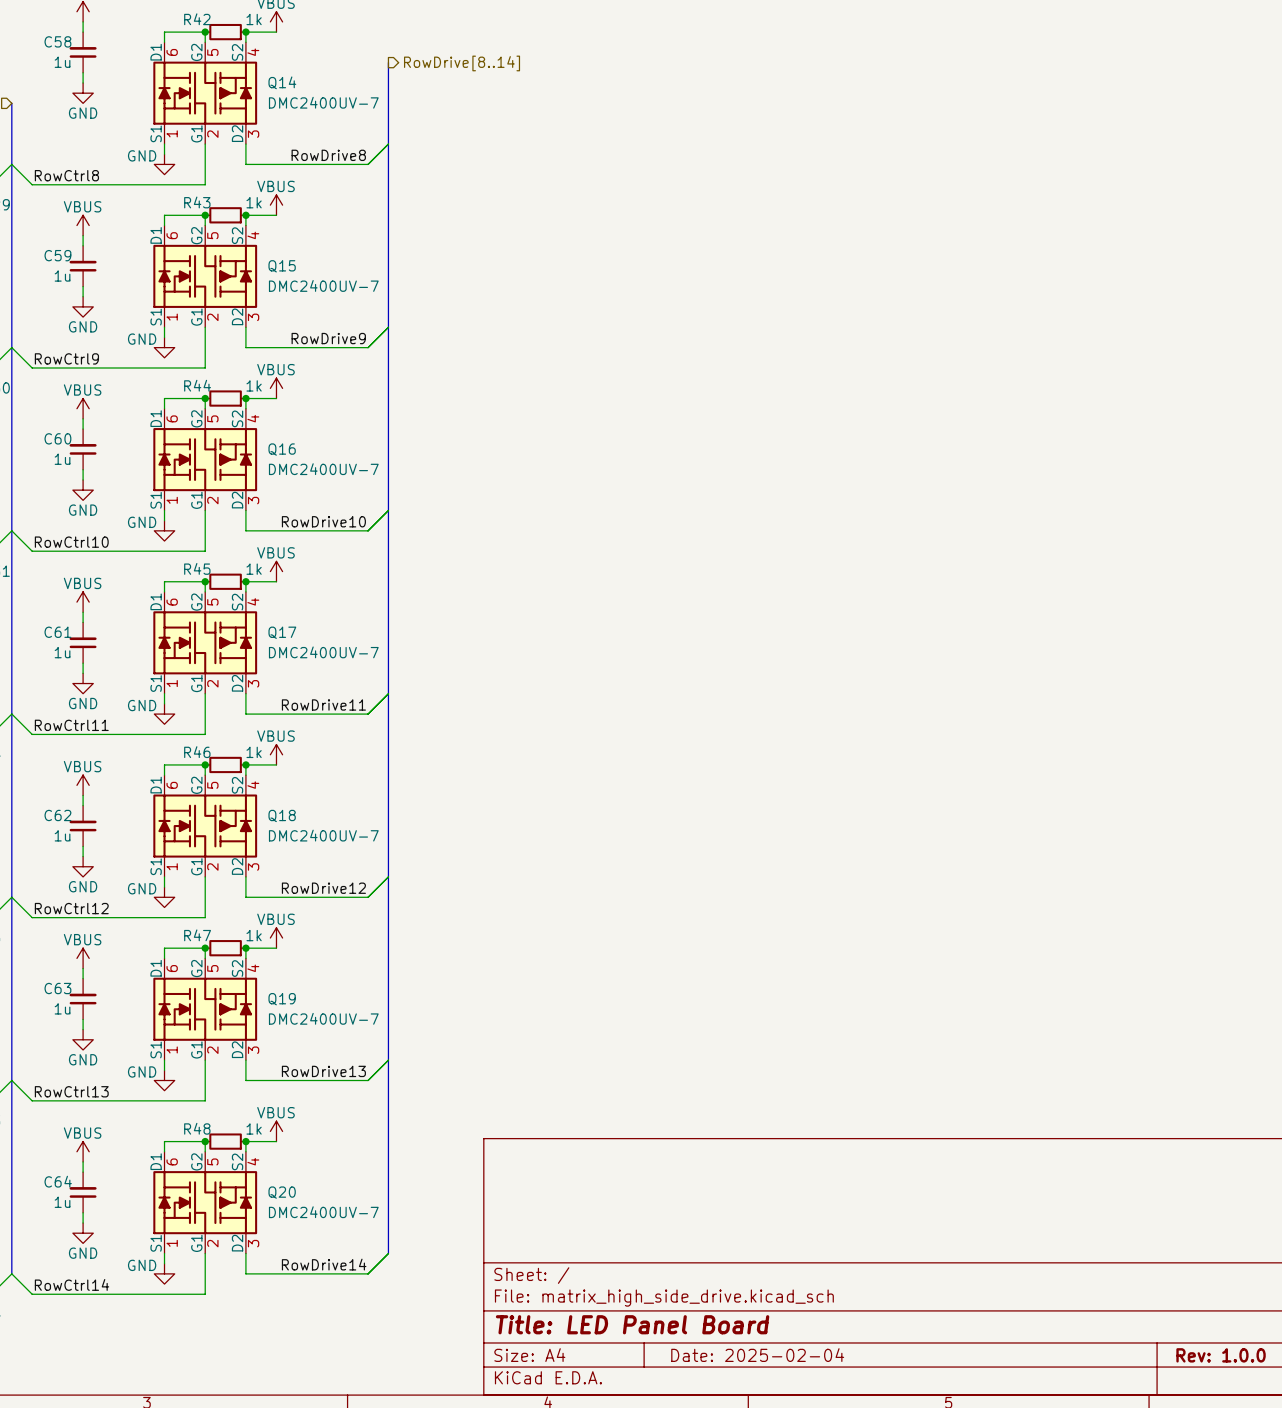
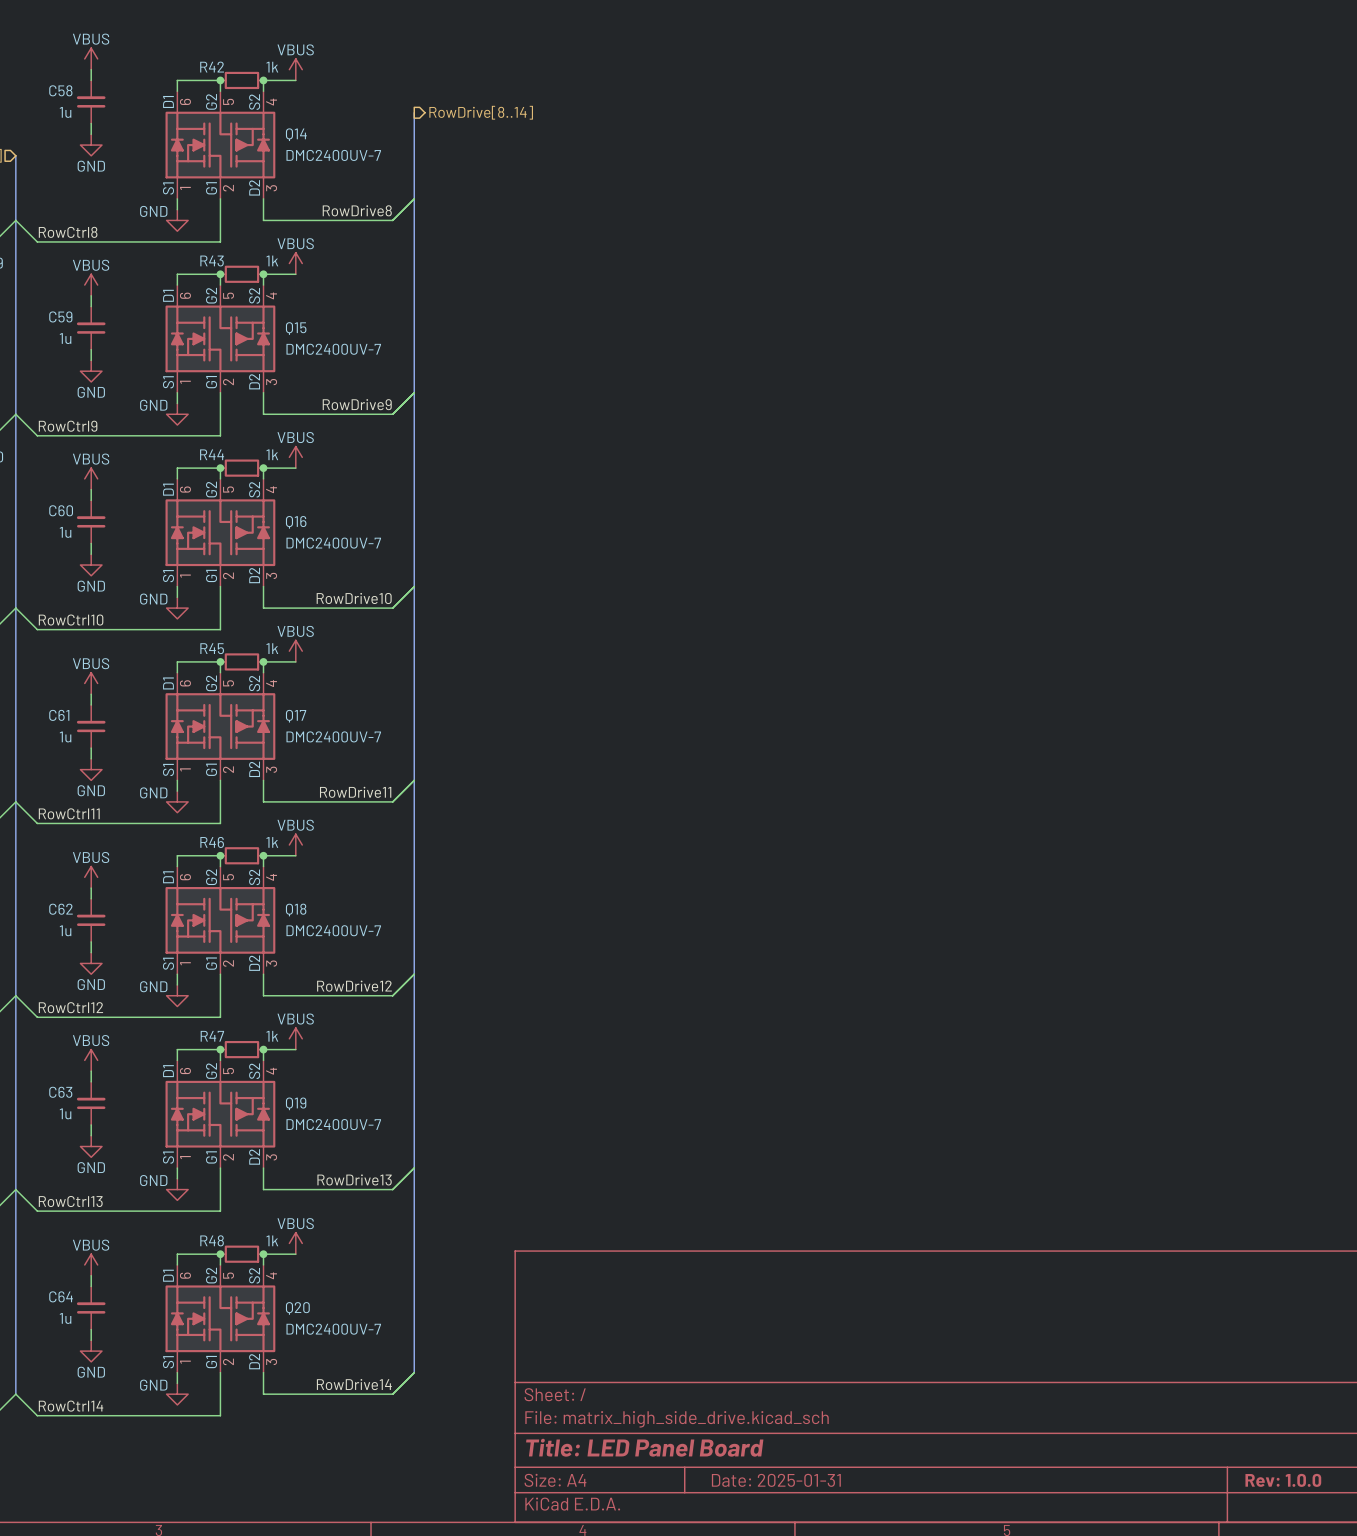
title block: Date: 2025-02-04 (757, 1355) -> Date: 2025-01-31 (776, 1480)

